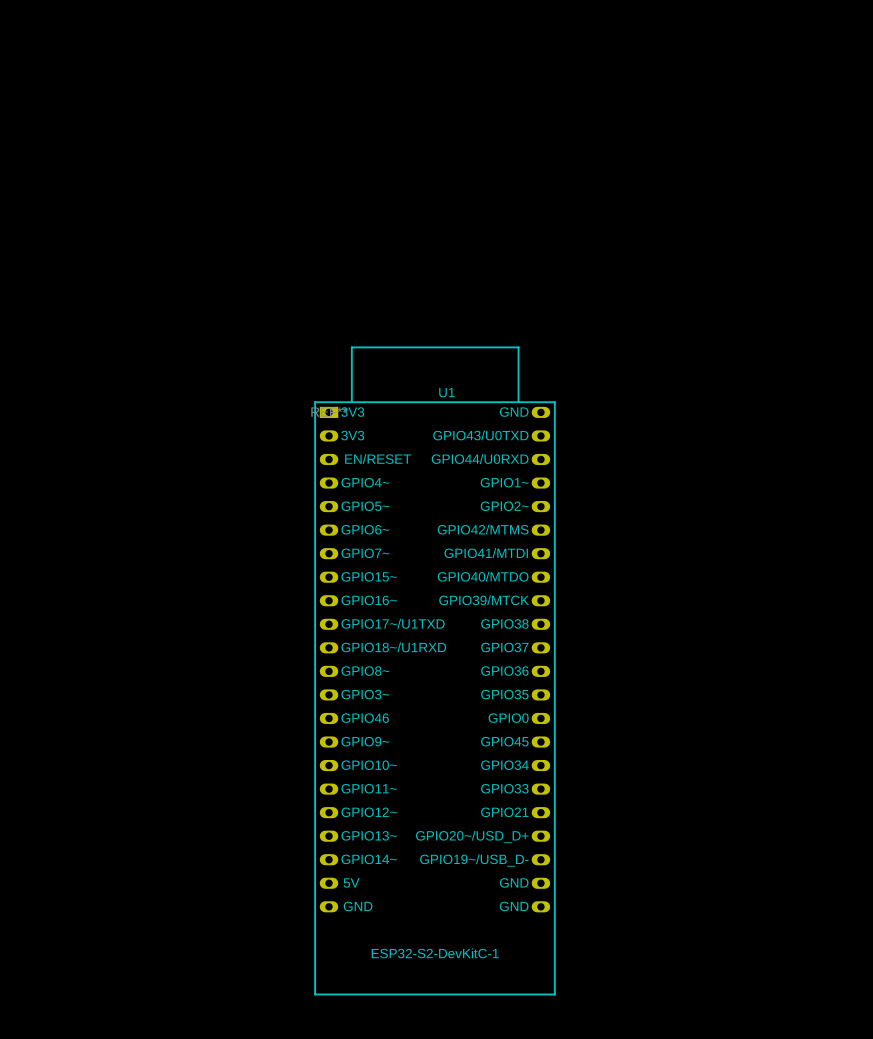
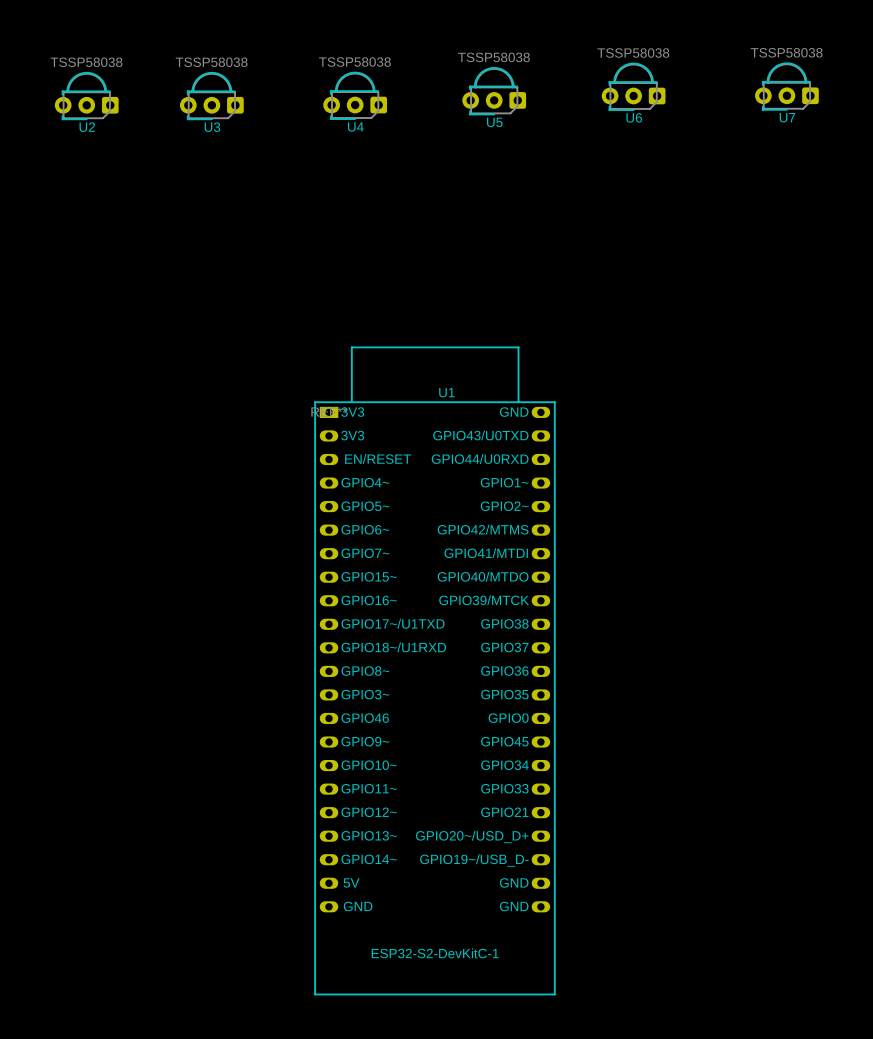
U6: none -> TSSP58038 (633, 86)
U7: none -> TSSP58038 (786, 86)
U5: none -> TSSP58038 (494, 91)
U4: none -> TSSP58038 (355, 95)
U2: none -> TSSP58038 (86, 96)
U3: none -> TSSP58038 (211, 96)

